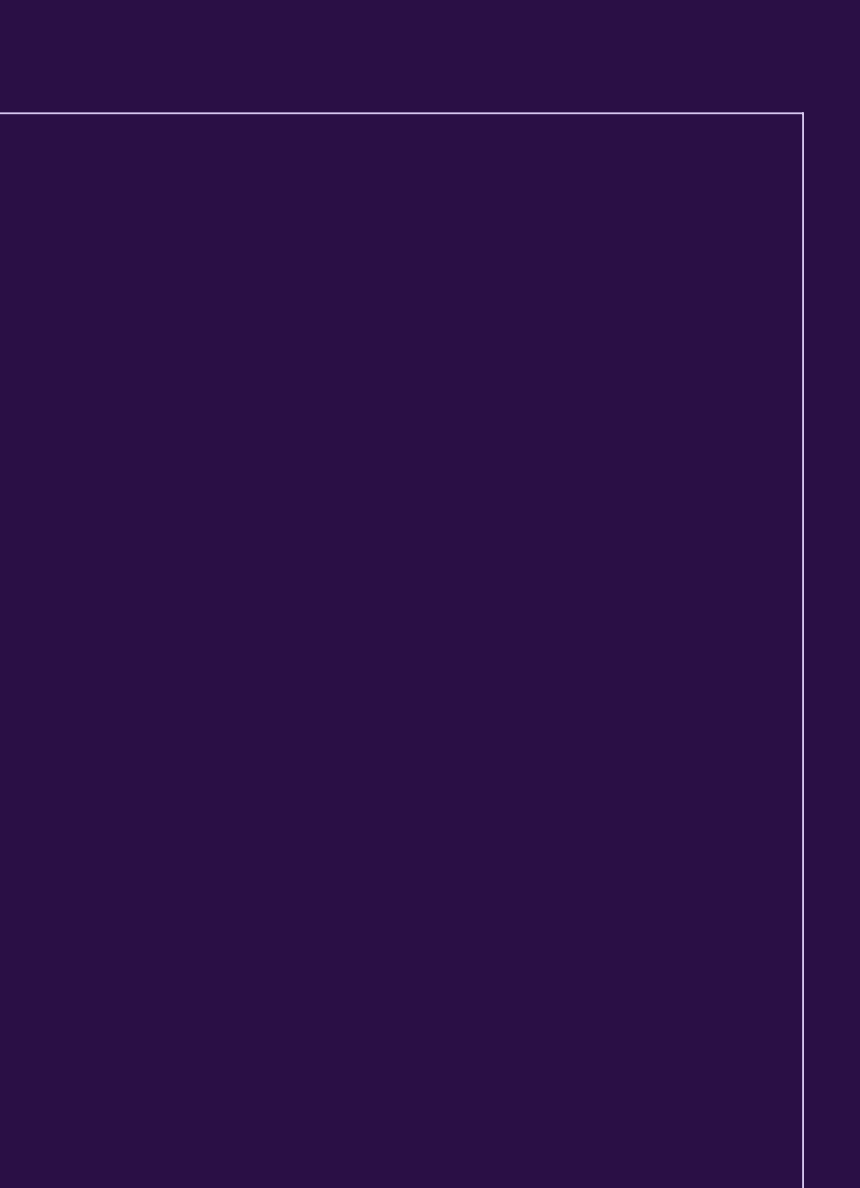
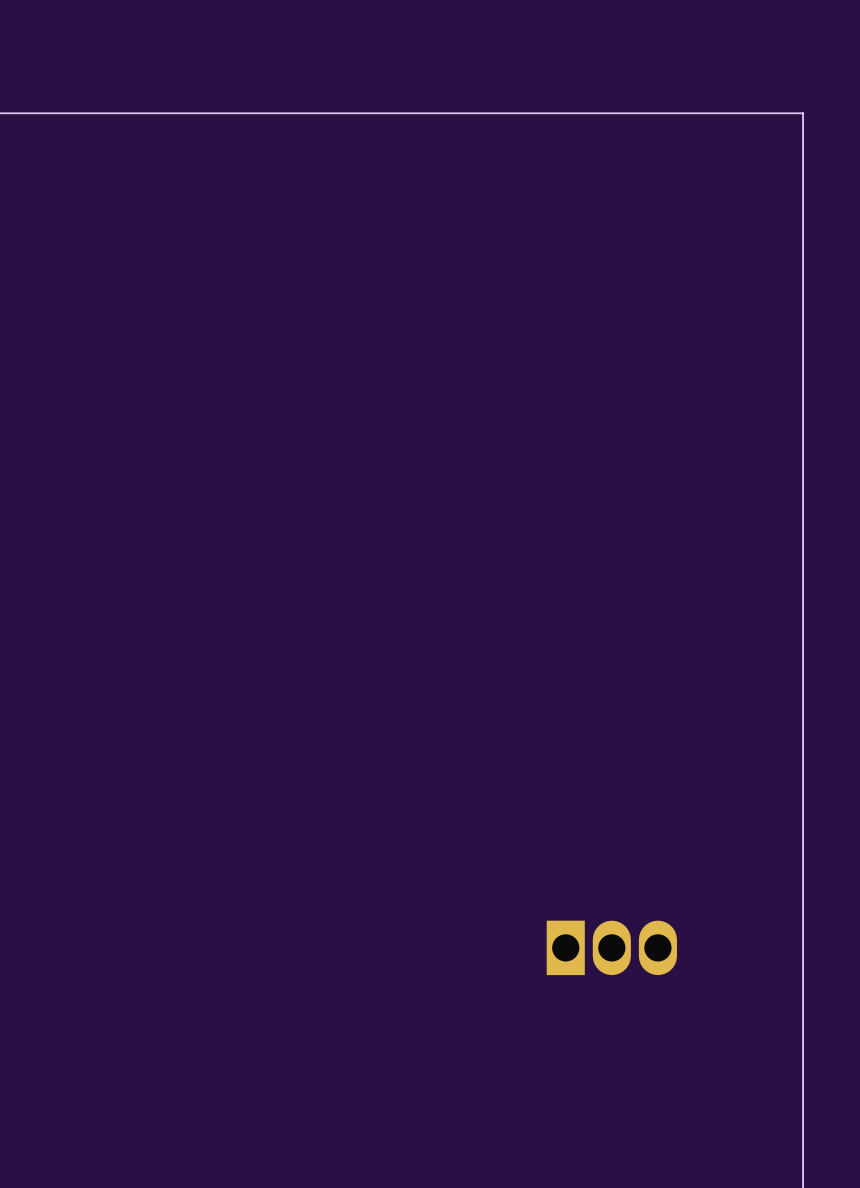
part: none -> (611, 947)

